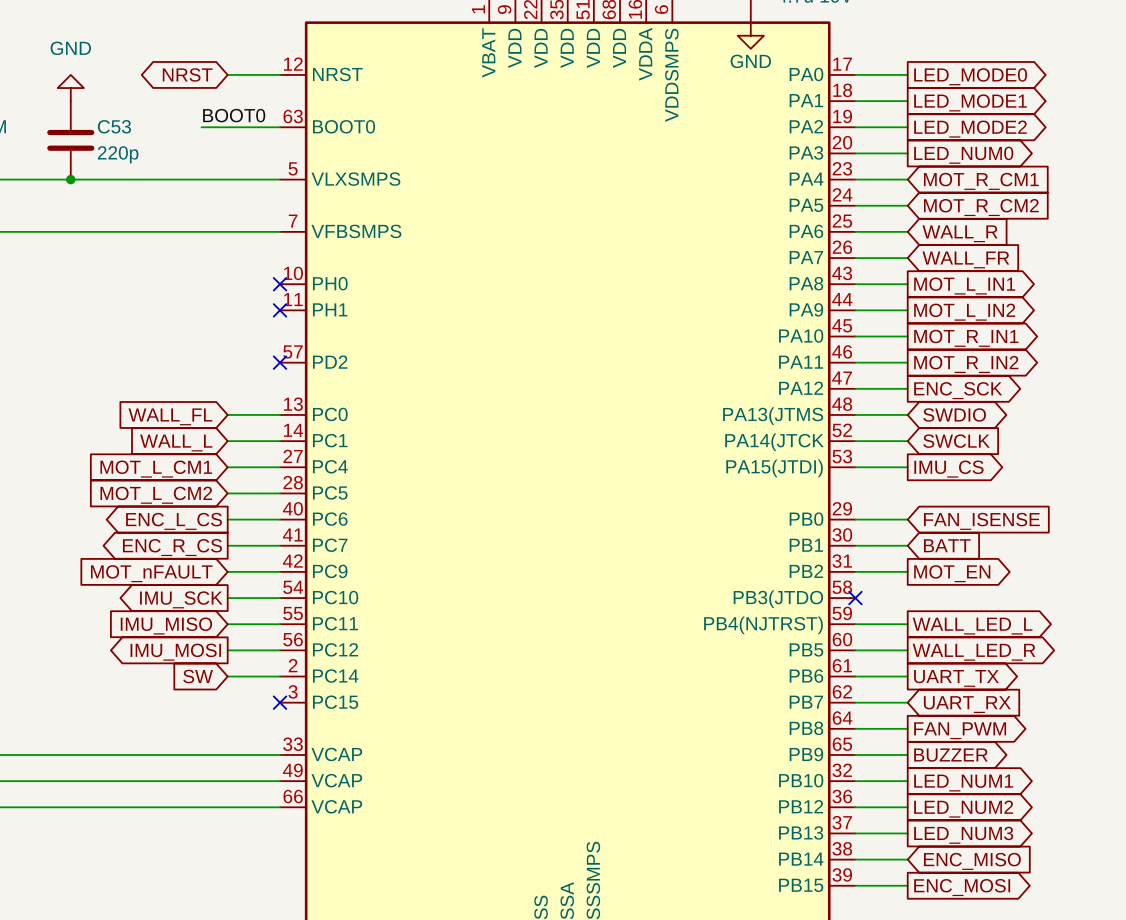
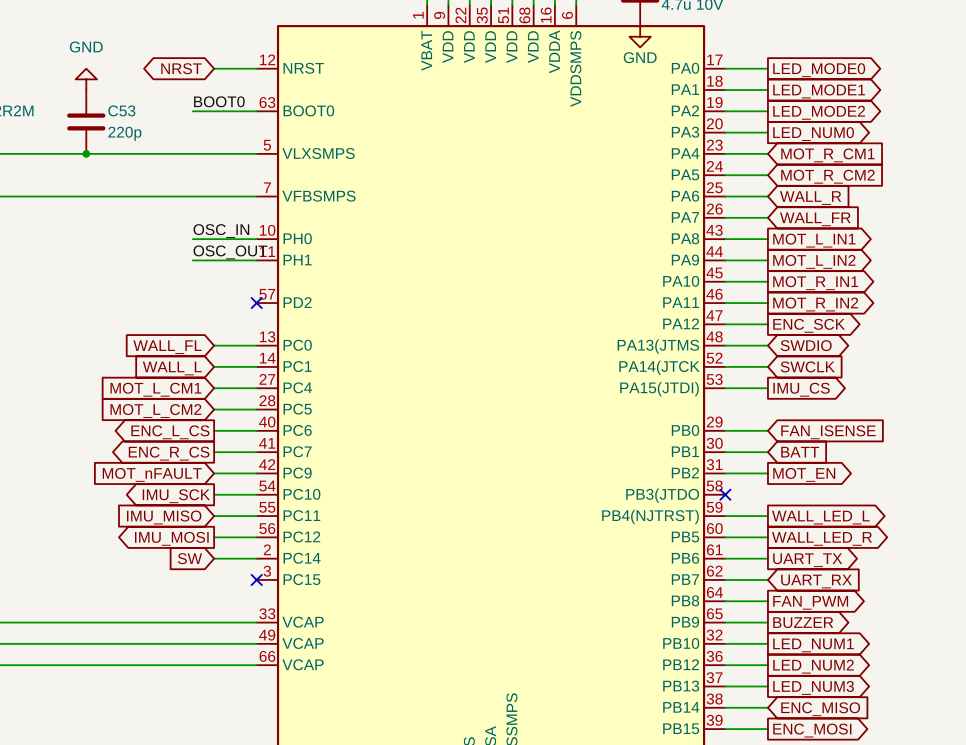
label: none -> OSC_IN (221, 231)
wire: none -> (192, 239) (256, 239)
no-connect mark: (280, 284) -> none
label: none -> OSC_OUT (230, 252)
wire: none -> (192, 260) (256, 260)
no-connect mark: (280, 310) -> none

